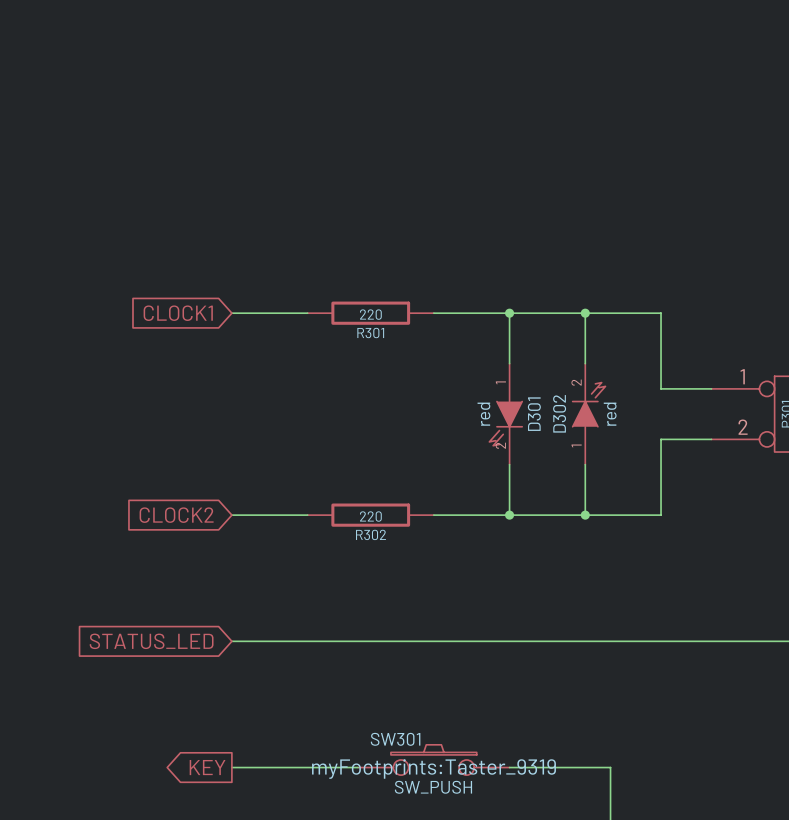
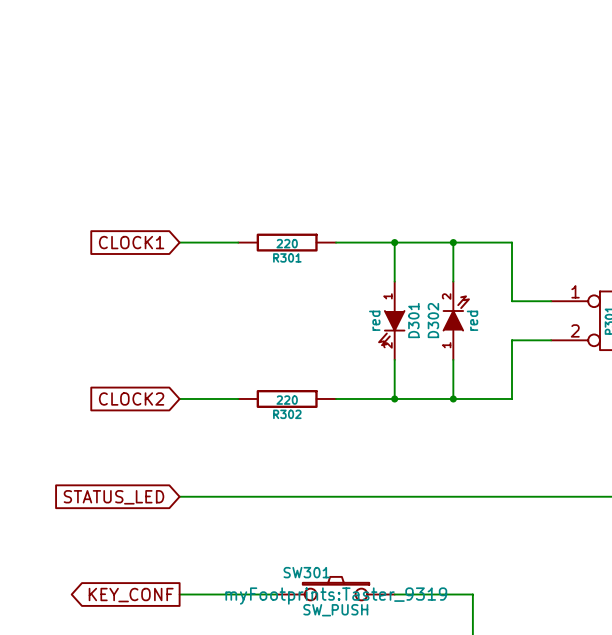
global label: KEY (207, 767) -> KEY_CONF (131, 595)

